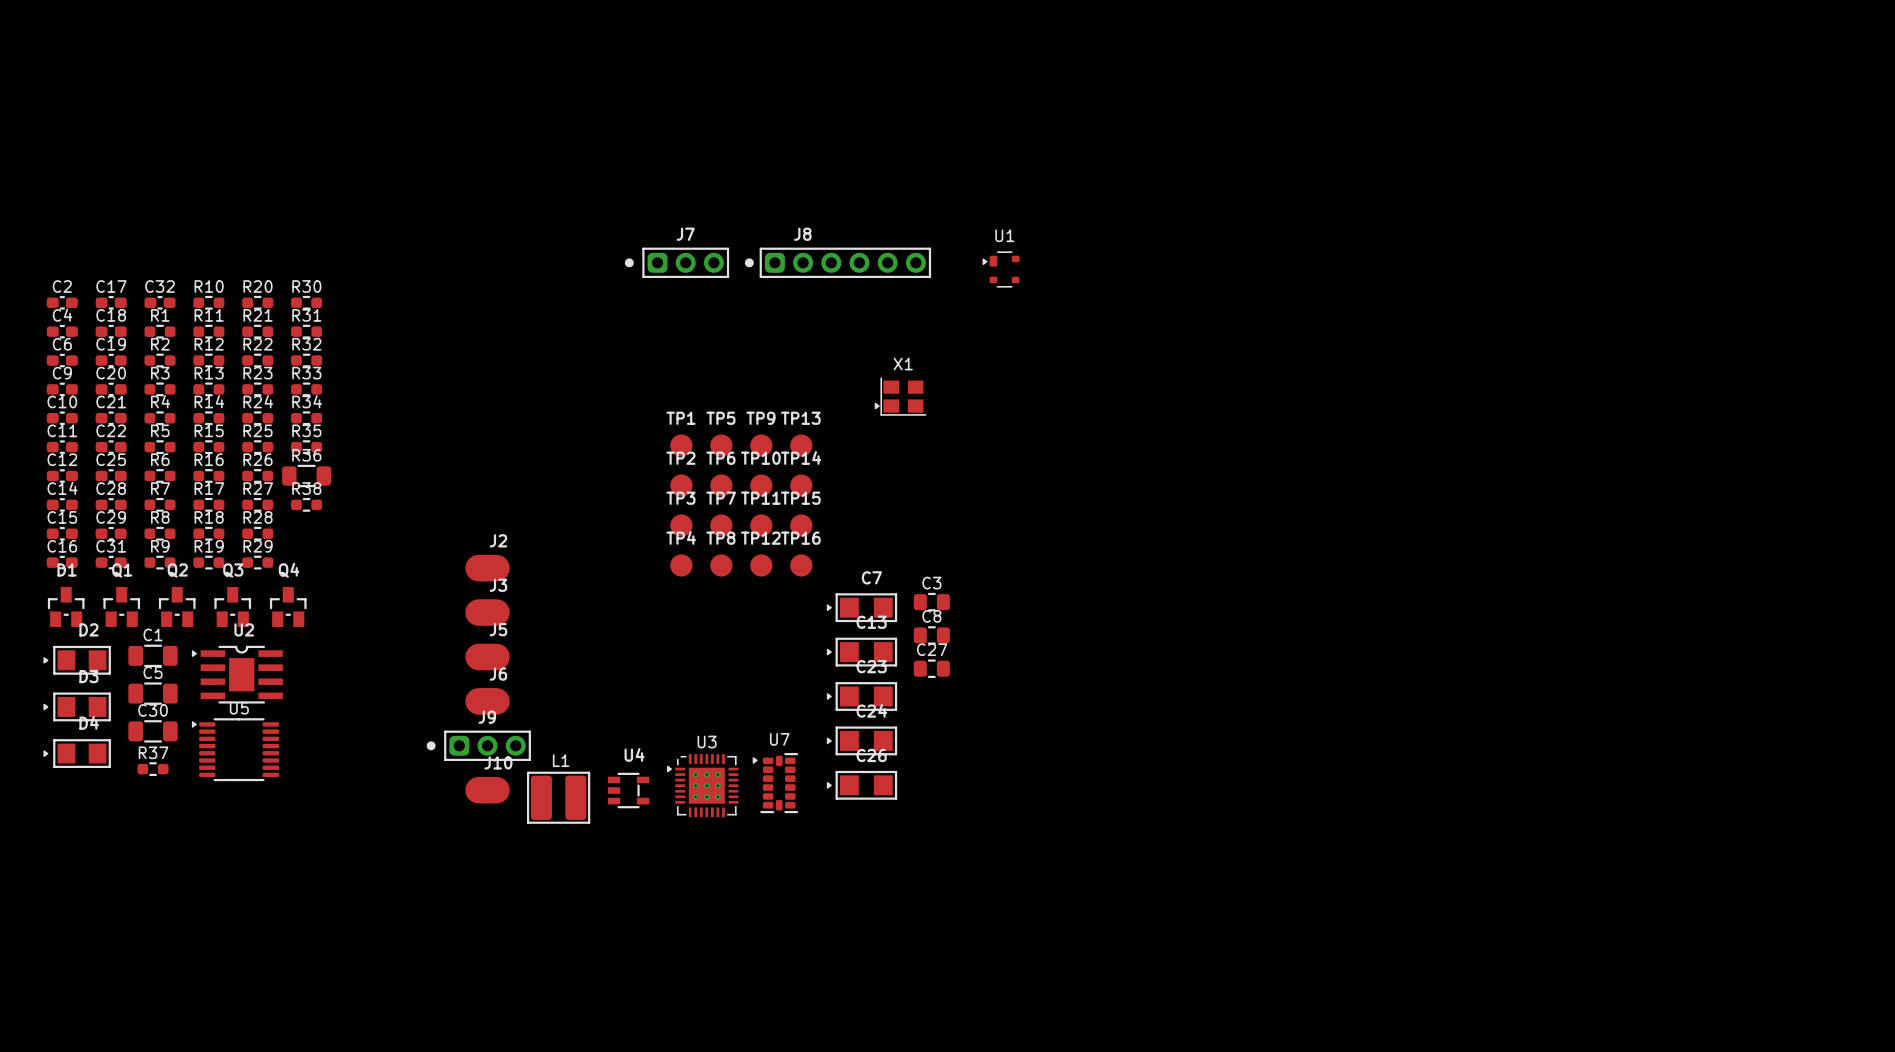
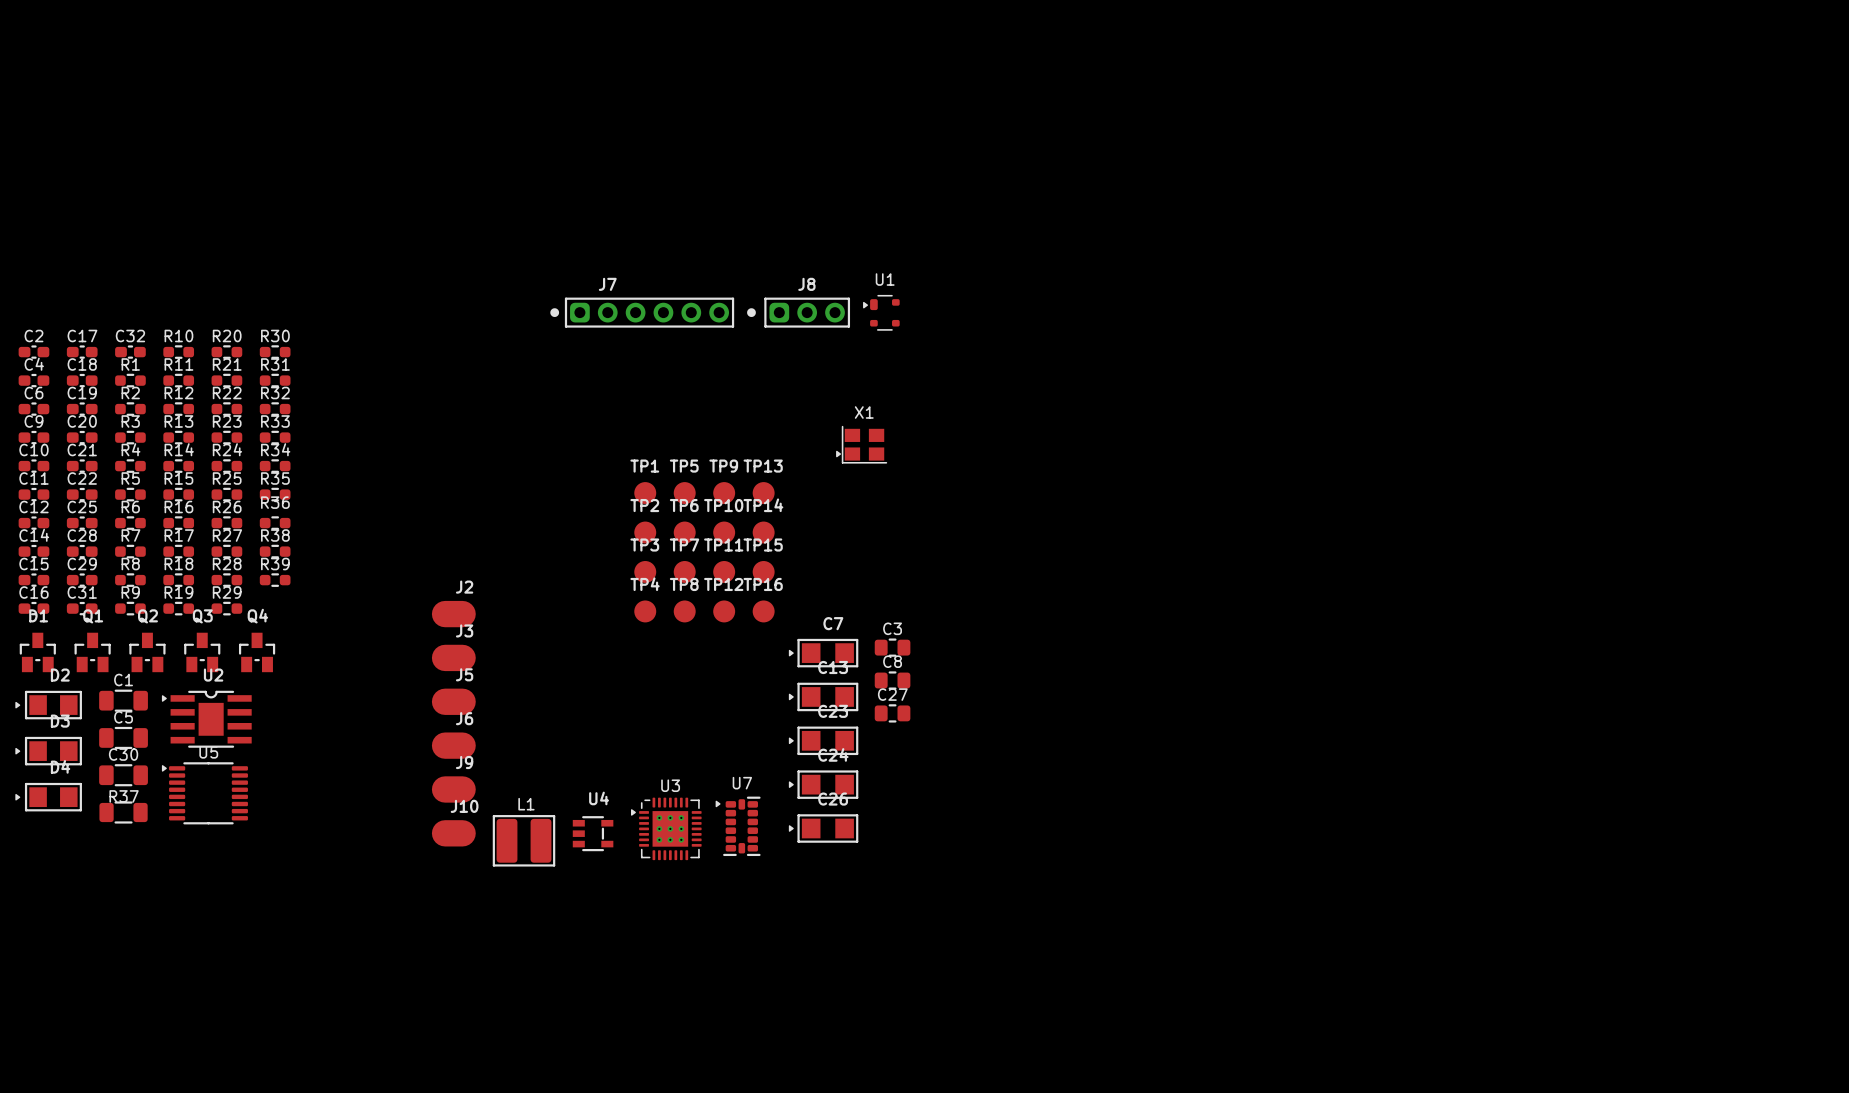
J7 name position: J7 (685, 234) -> J7 (607, 284)
J8 name position: J8 (802, 234) -> J8 (806, 284)
J7 footprint: [624, 247, 730, 279] -> [550, 297, 735, 328]
J8 footprint: [744, 247, 932, 279] -> [747, 297, 851, 328]
U1 position: (1001, 269) -> (881, 312)
R36 footprint: [282, 464, 331, 488] -> [259, 516, 291, 530]
R39: none -> (275, 580)
J9 footprint: [426, 730, 531, 762] -> [431, 776, 476, 803]
R37 footprint: [137, 762, 169, 777] -> [99, 801, 148, 824]

